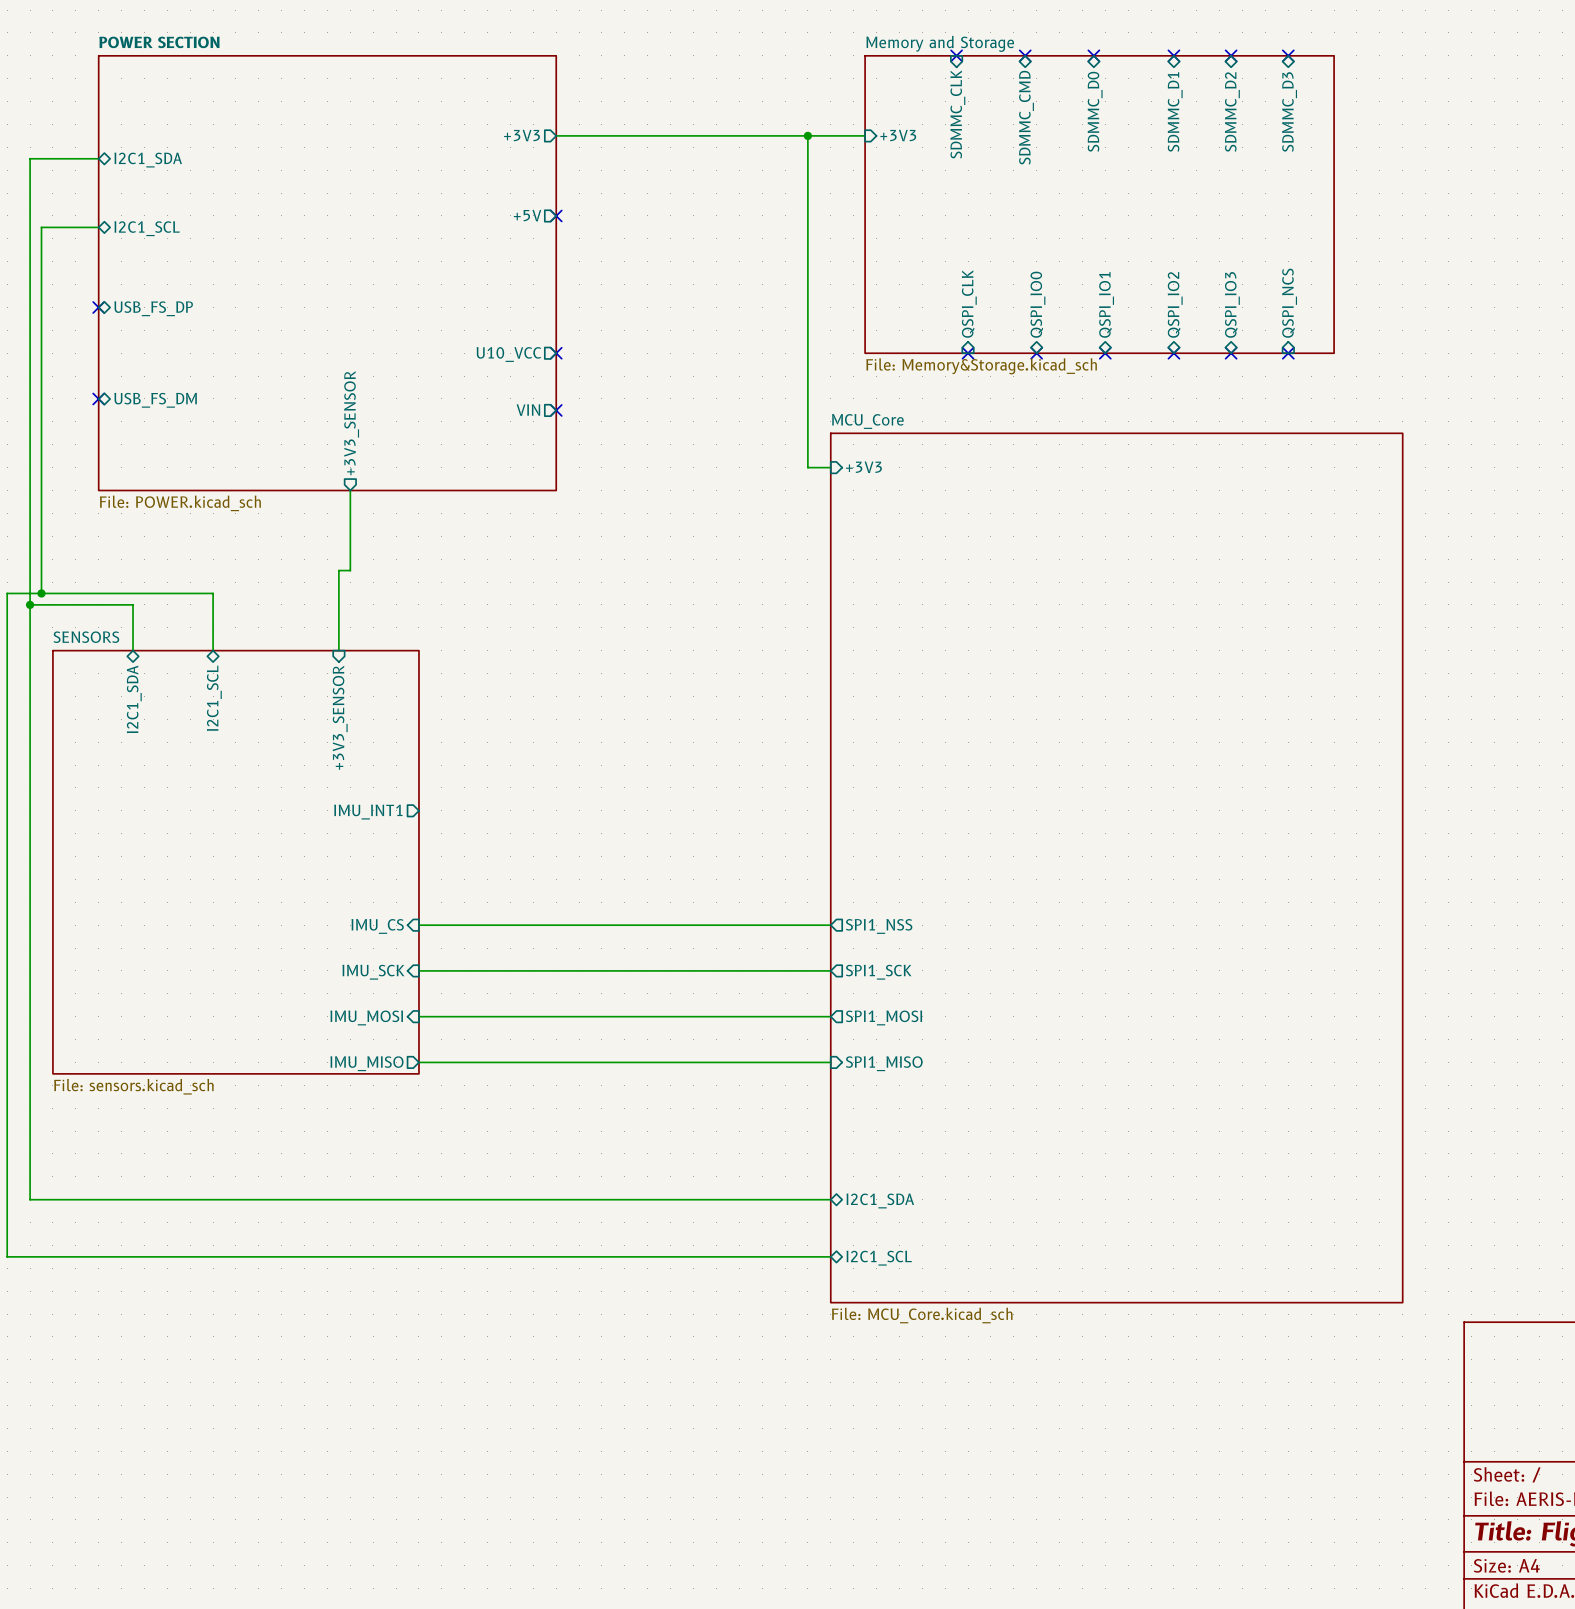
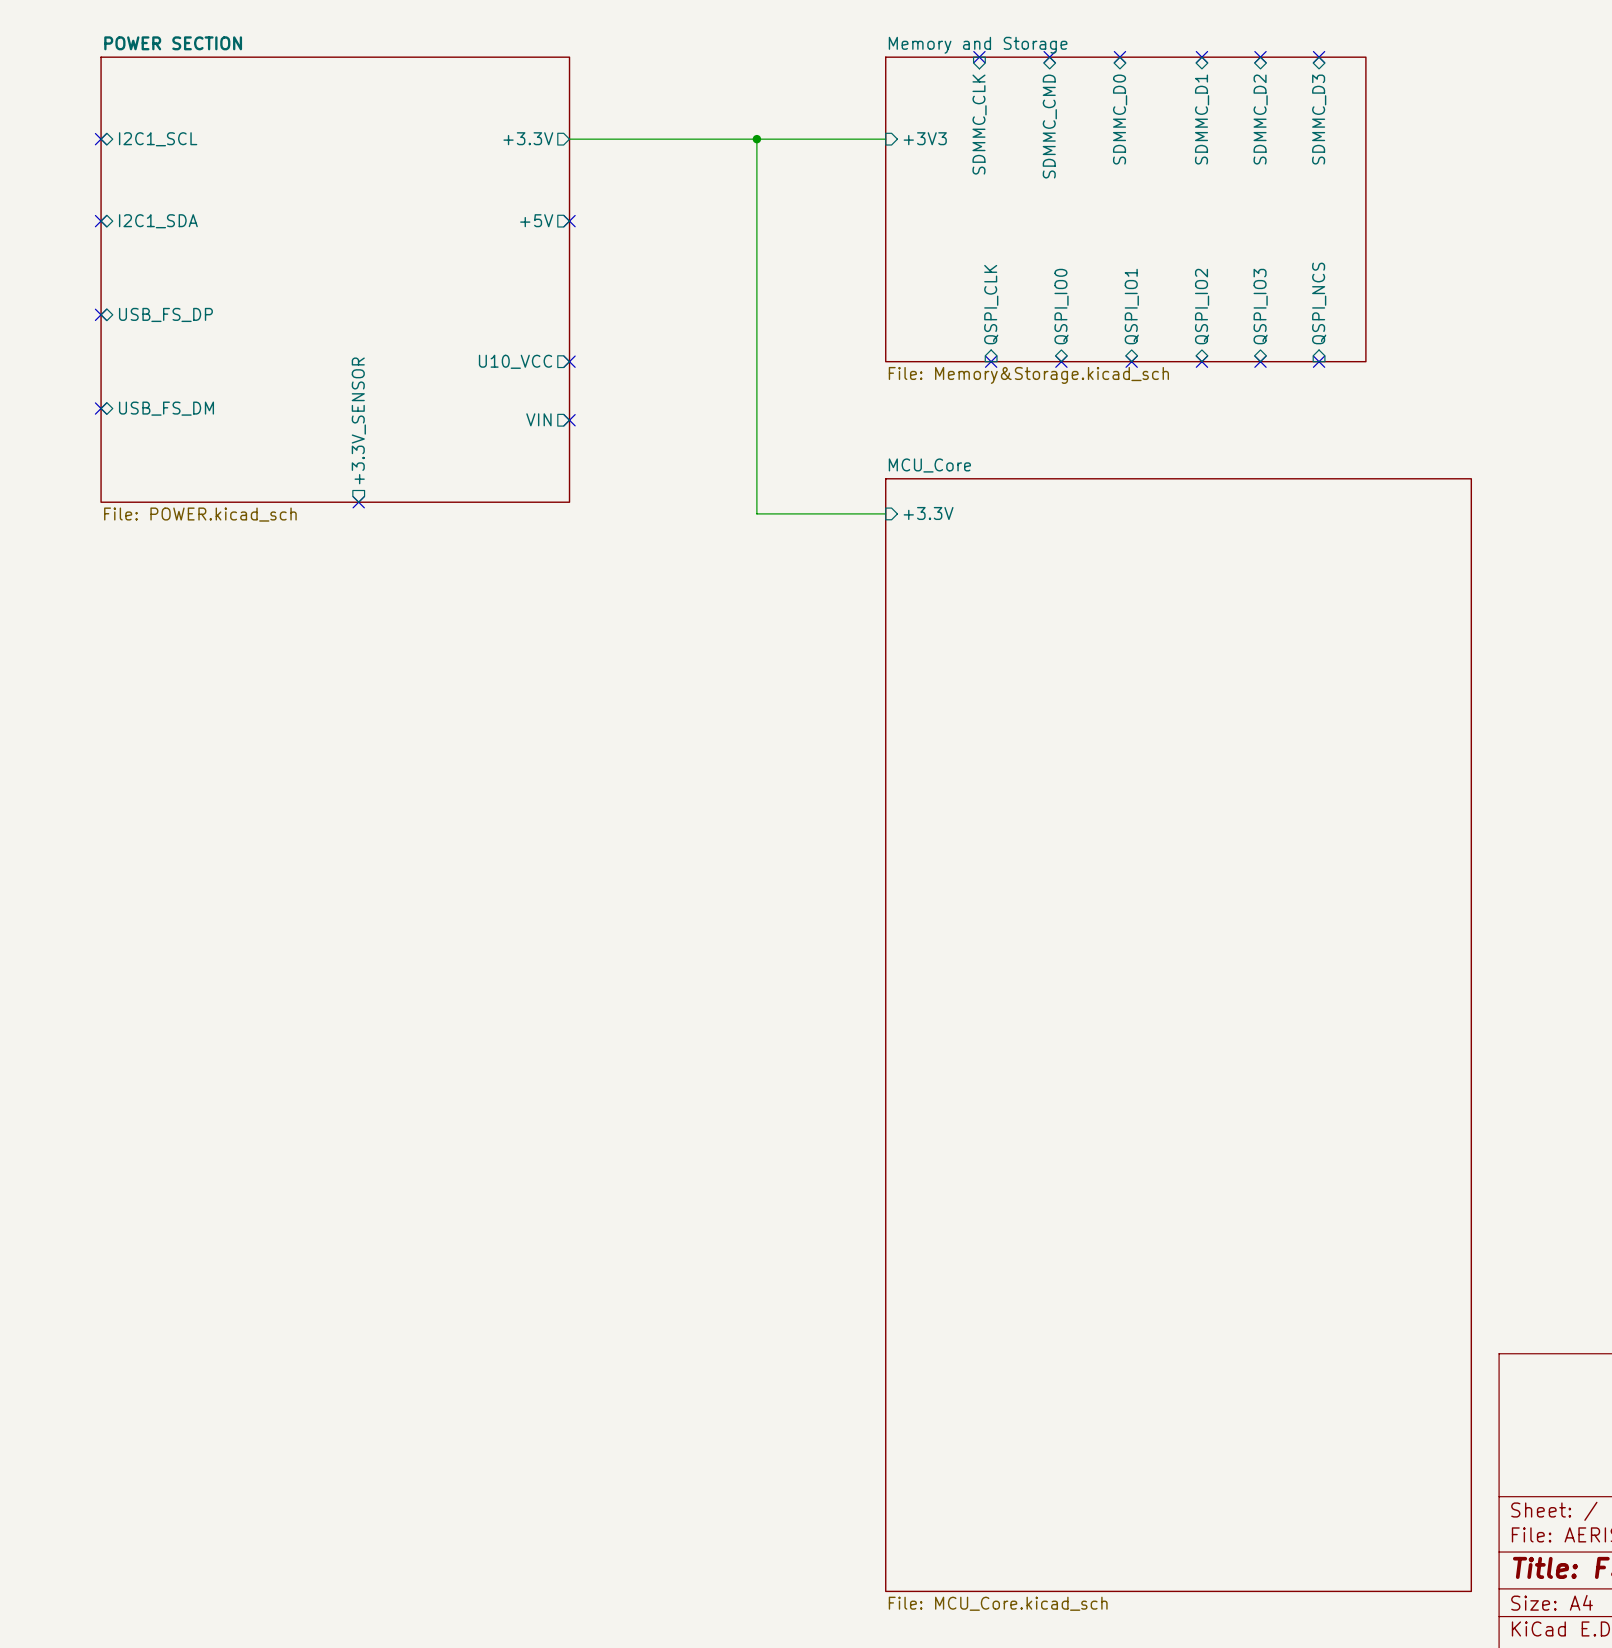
no-connect mark: none -> (101, 139)
sheet pin: +3V3 (521, 135) -> +3.3V (528, 138)
wire: none -> (756, 139) (756, 513) (885, 513)
junction: none -> (756, 139)
wire: (807, 135) (807, 467) (830, 467) -> none
junction: (807, 135) -> none
wire: (98, 158) (30, 158) (30, 1199) (830, 1199) -> none
sheet pin position: I2C1_SDA (148, 160) -> I2C1_SDA (158, 221)
no-connect mark: none -> (101, 221)
wire: (98, 227) (41, 227) (41, 593) -> none
sheet pin position: I2C1_SCL (147, 228) -> I2C1_SCL (158, 139)
sheet pin: +3V3_SENSOR (351, 423) -> +3.3V_SENSOR (358, 420)
sheet pin: +3V3 (863, 467) -> none
wire: (350, 490) (350, 570) (338, 570) (338, 650) -> none
no-connect mark: none -> (358, 502)
sheet pin: none -> +3.3V (928, 513)
junction: (41, 593) -> none
wire: (30, 604) (133, 604) (133, 650) -> none
junction: (30, 604) -> none
wire: (213, 650) (213, 593) (7, 593) (7, 1256) (830, 1256) -> none
sheet pin: I2C1_SCL (214, 698) -> none
sheet pin: I2C1_SDA (134, 699) -> none
sheet pin: +3V3_SENSOR (340, 717) -> none
sheet pin: IMU_INT1 (368, 812) -> none
sheet SENSORS: File: sensors.kicad_sch (235, 862) -> none
sheet MCU_Core: File: MCU_Core.kicad_sch (1116, 867) -> none
wire: (418, 925) (830, 925) -> none
sheet pin: IMU_CS (377, 926) -> none
sheet pin: SPI1_NSS (879, 926) -> none
wire: (418, 970) (830, 970) -> none
sheet pin: IMU_SCK (373, 972) -> none
sheet pin: SPI1_SCK (878, 972) -> none
sheet MCU_Core: none -> File: MCU_Core.kicad_sch (1178, 1035)
wire: (418, 1016) (830, 1016) -> none
sheet pin: IMU_MOSI (366, 1017) -> none
sheet pin: SPI1_MOSI (883, 1017) -> none
wire: (418, 1062) (830, 1062) -> none
sheet pin: IMU_MISO (366, 1063) -> none
sheet pin: SPI1_MISO (884, 1063) -> none
sheet pin: I2C1_SDA (880, 1200) -> none
sheet pin: I2C1_SCL (879, 1258) -> none

